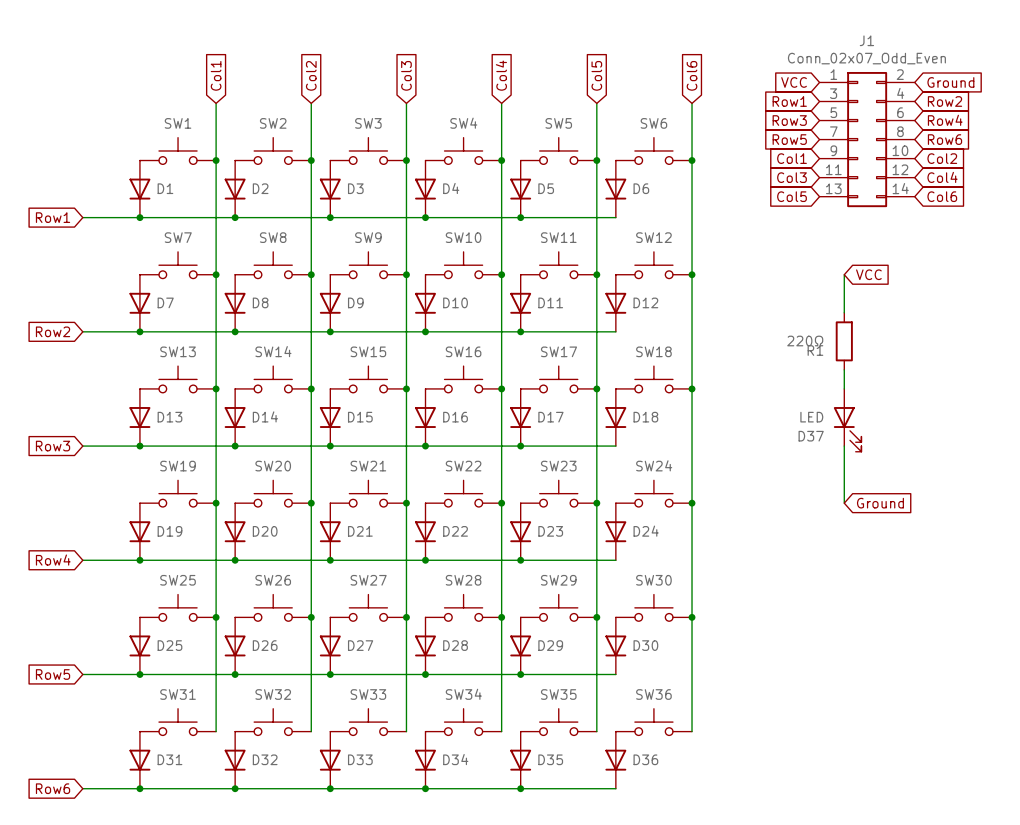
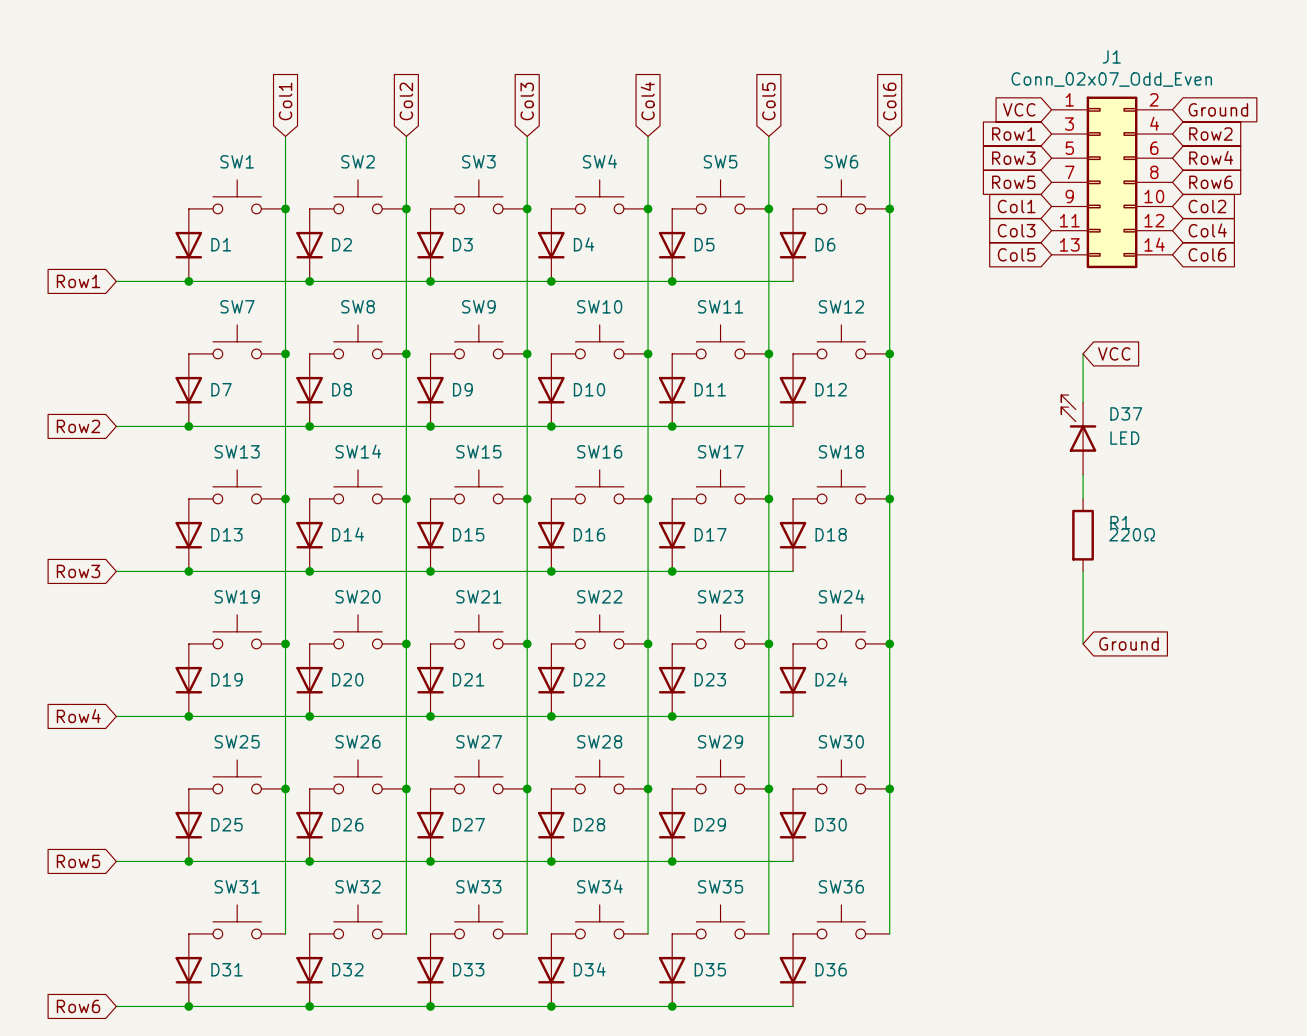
R1 value position: 220Ω (805, 341) -> 220Ω (1132, 534)
R1 position: (844, 341) -> (1083, 535)
R1 name position: R1 (815, 350) -> R1 (1120, 522)
D37 position: (847, 420) -> (1078, 434)
D37 rotation: 0° (847, 429) -> 180° (1078, 423)

